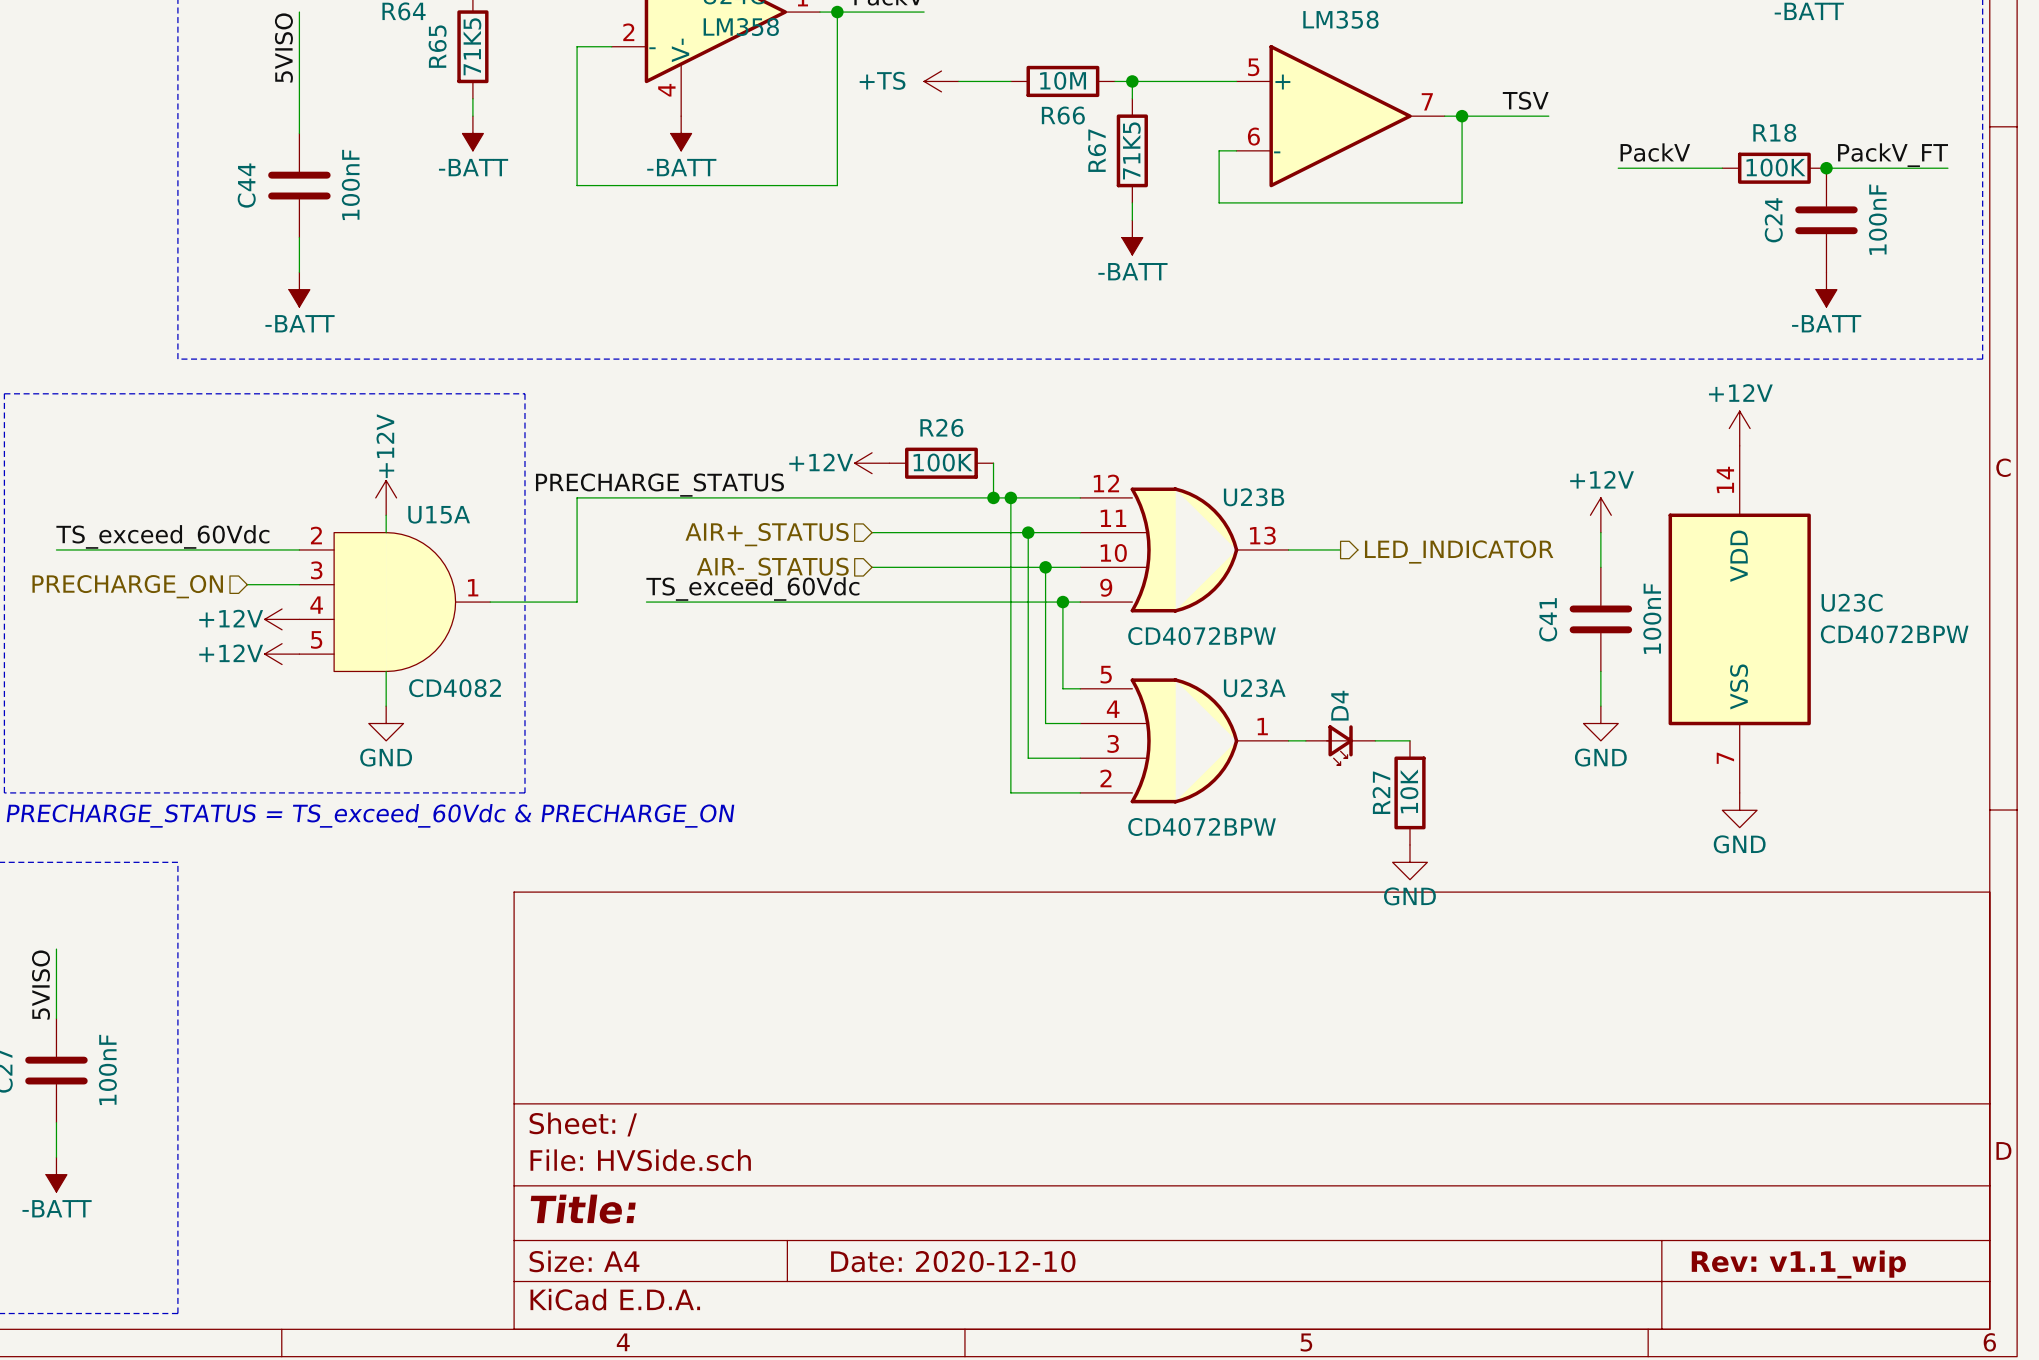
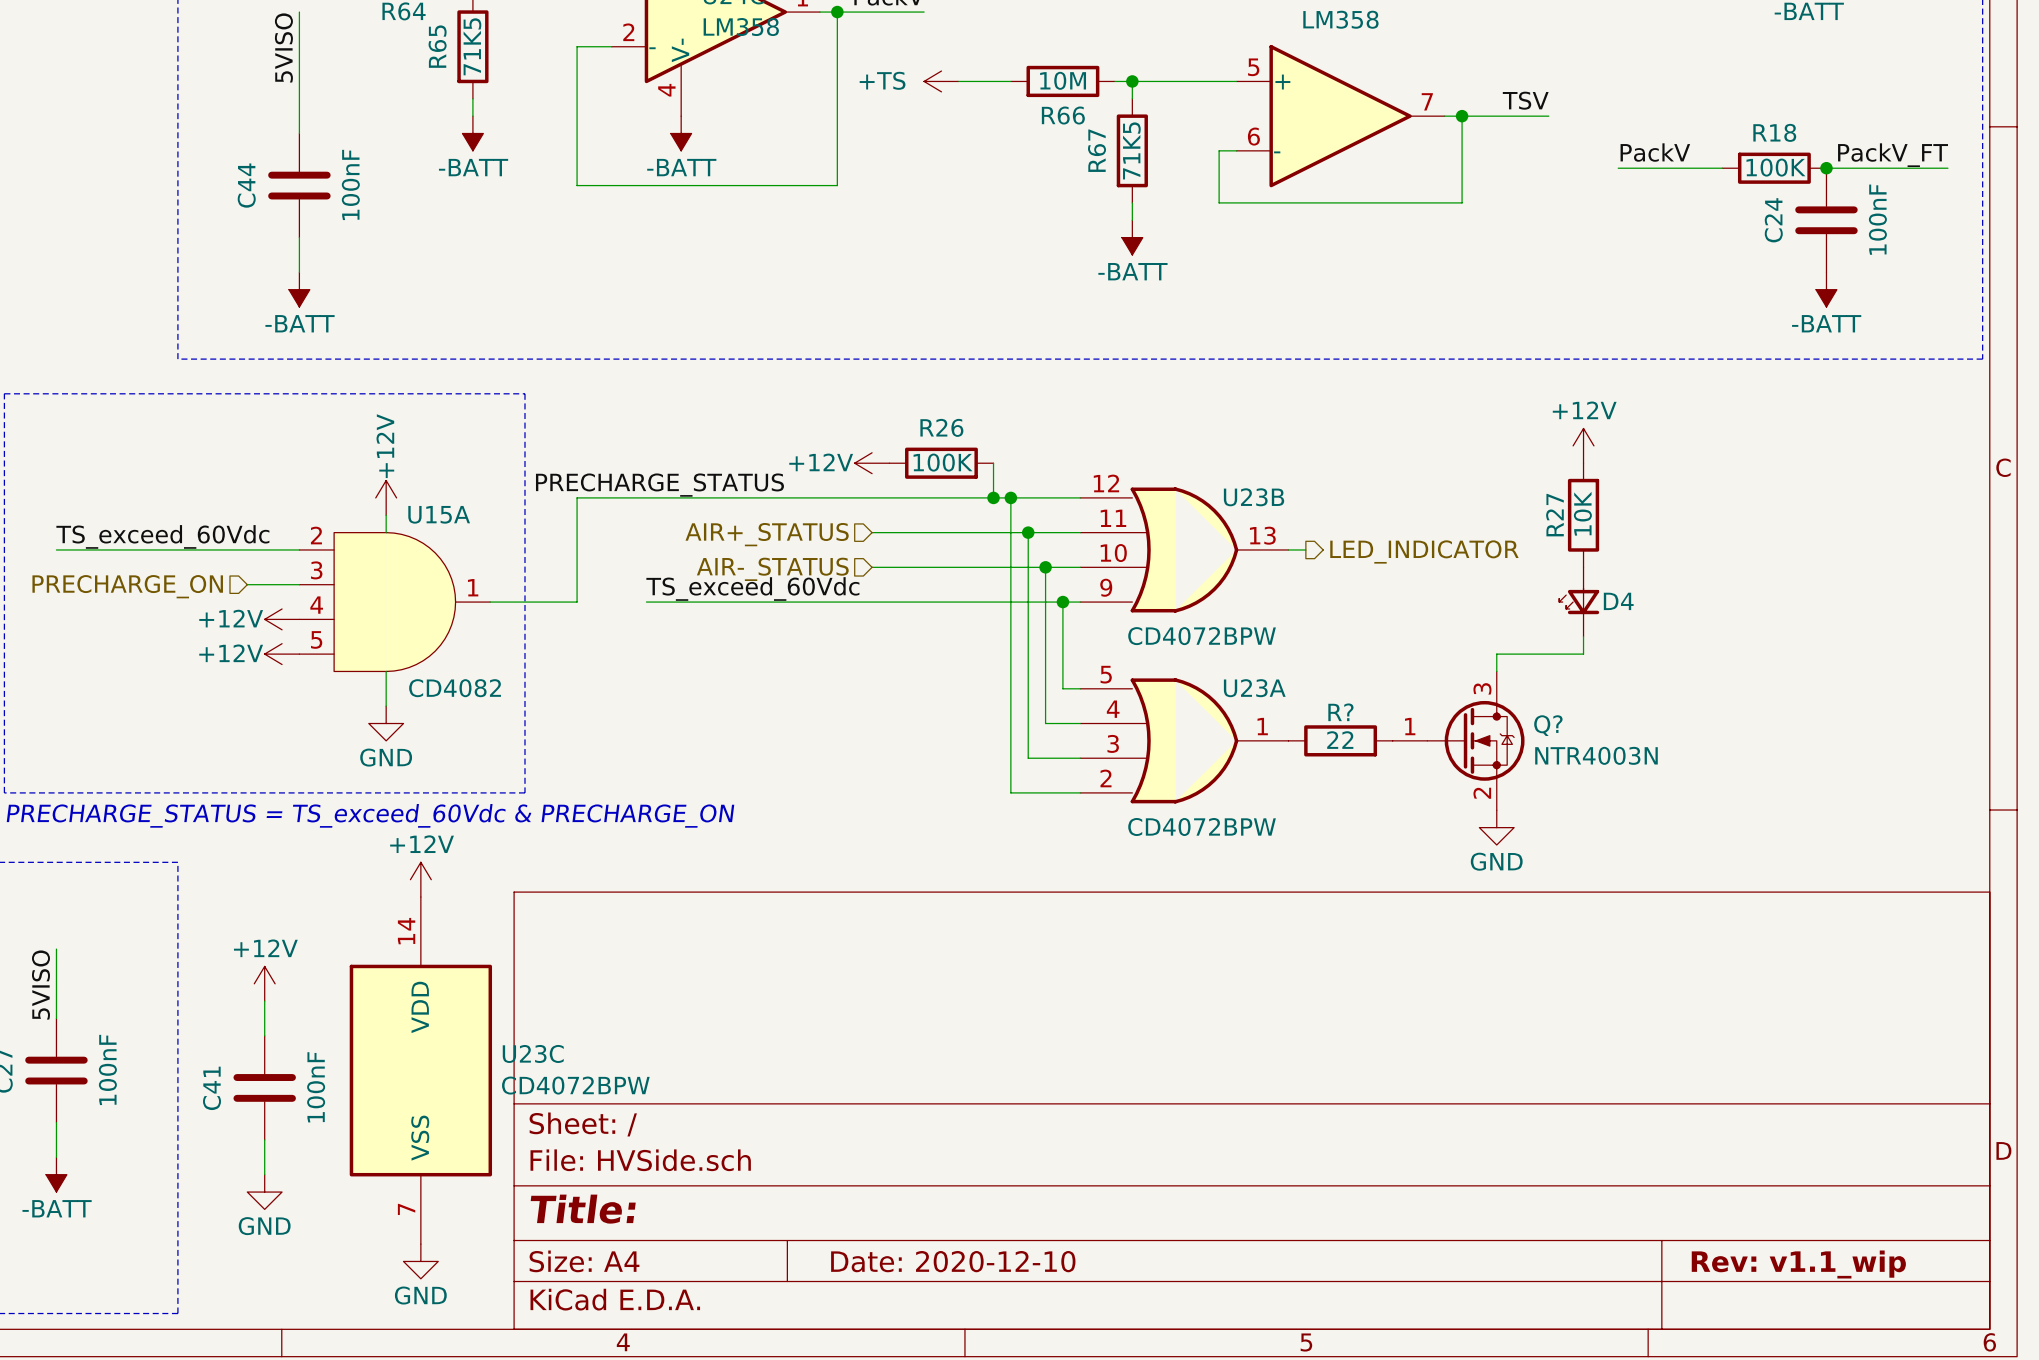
power symbol: +12V (1739, 428) -> none
power symbol position: +12V (1600, 515) -> +12V (1583, 445)
wire: (1600, 532) (1600, 567) -> none
wire: (1305, 549) (1340, 549) -> none
hierarchical label position: LED_INDICATOR (1459, 551) -> LED_INDICATOR (1424, 551)
C41 position: (1600, 619) -> (264, 1087)
U23C position: (1739, 619) -> (420, 1070)
wire: none -> (1583, 636) (1583, 654) (1496, 654) (1496, 671)
wire: (1600, 671) (1600, 706) -> none
power symbol: GND (1600, 723) -> none
R?: none -> 22 (1340, 740)
Q?: none -> NTR4003N (1458, 740)
D4 rotation: 0° (1339, 745) -> 90° clockwise (1579, 601)
D4 position: (1340, 745) -> (1579, 602)
R27 position: (1409, 792) -> (1583, 515)
power symbol: GND (1739, 810) -> none
power symbol: none -> GND (1496, 827)
power symbol: GND (1409, 862) -> none
power symbol: none -> +12V (420, 879)
power symbol: none -> +12V (264, 983)
wire: none -> (264, 1001) (264, 1035)
wire: none -> (264, 1139) (264, 1174)
power symbol: none -> GND (264, 1192)
power symbol: none -> GND (420, 1261)

